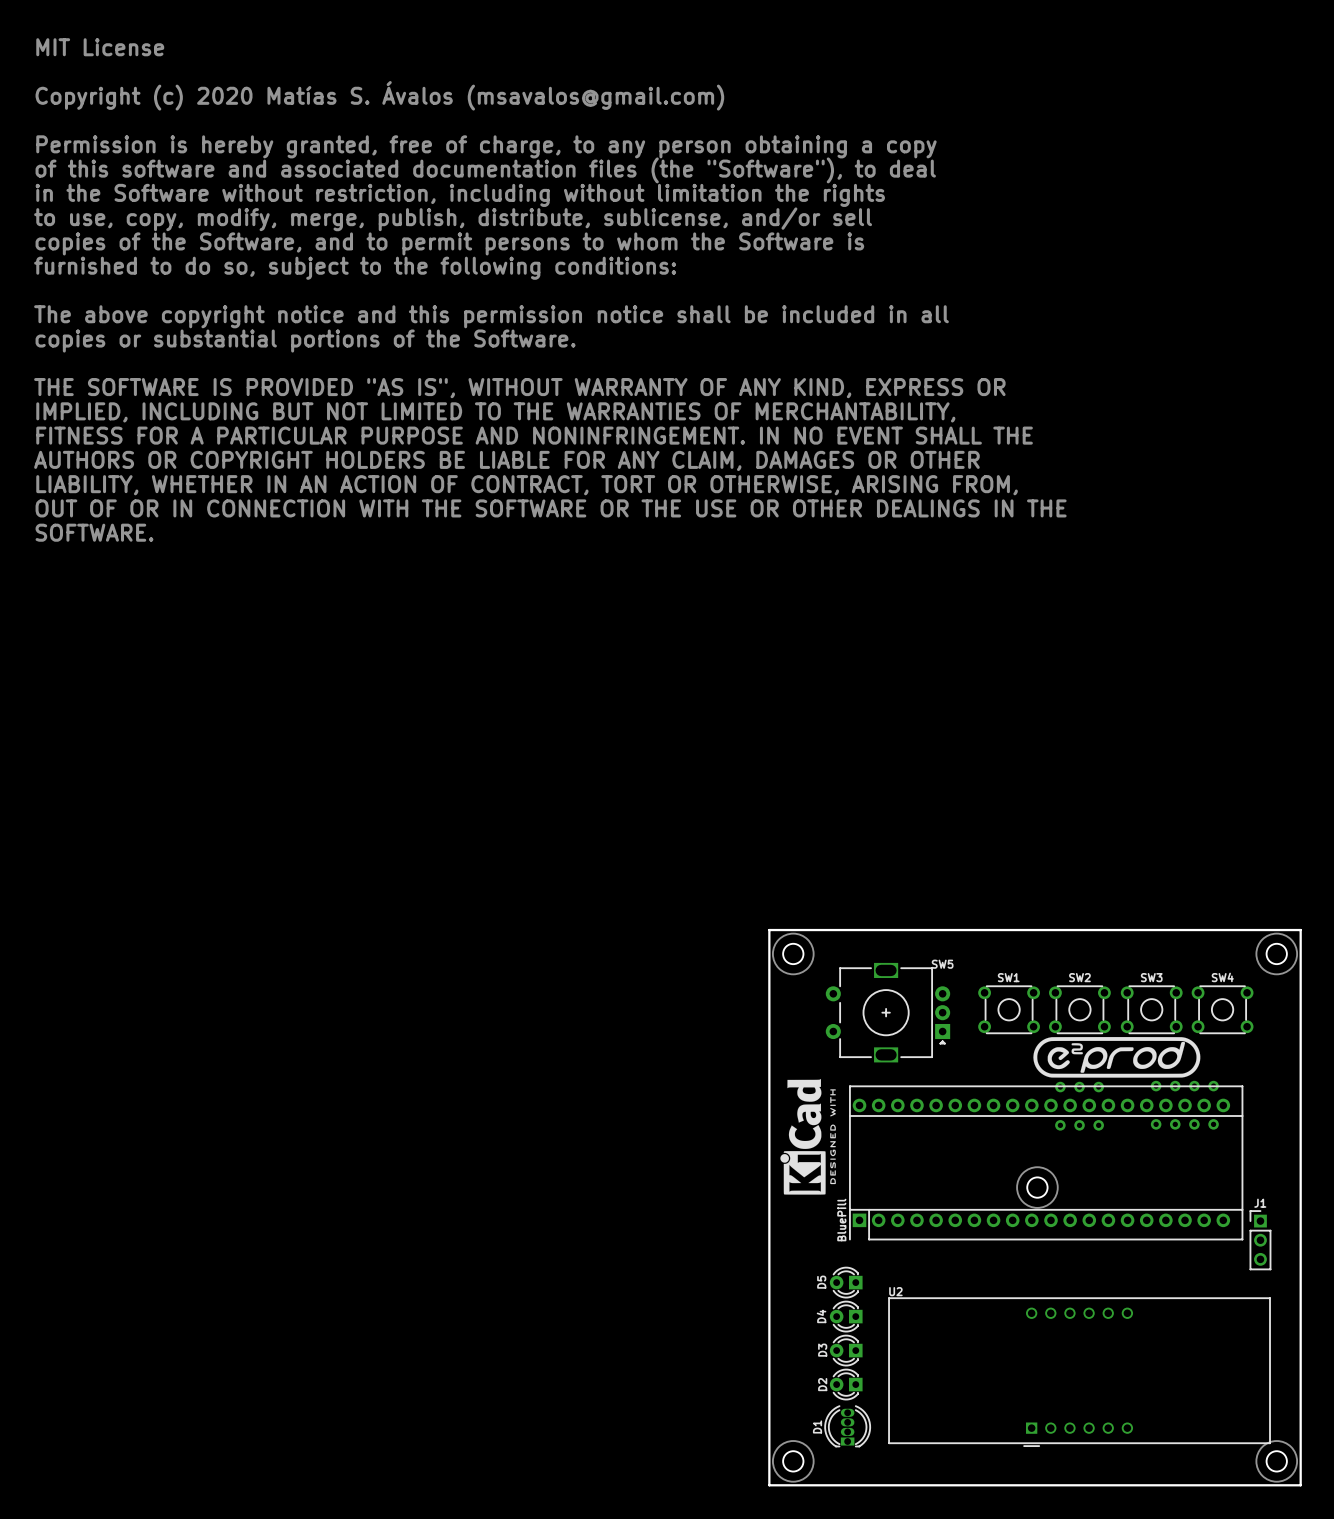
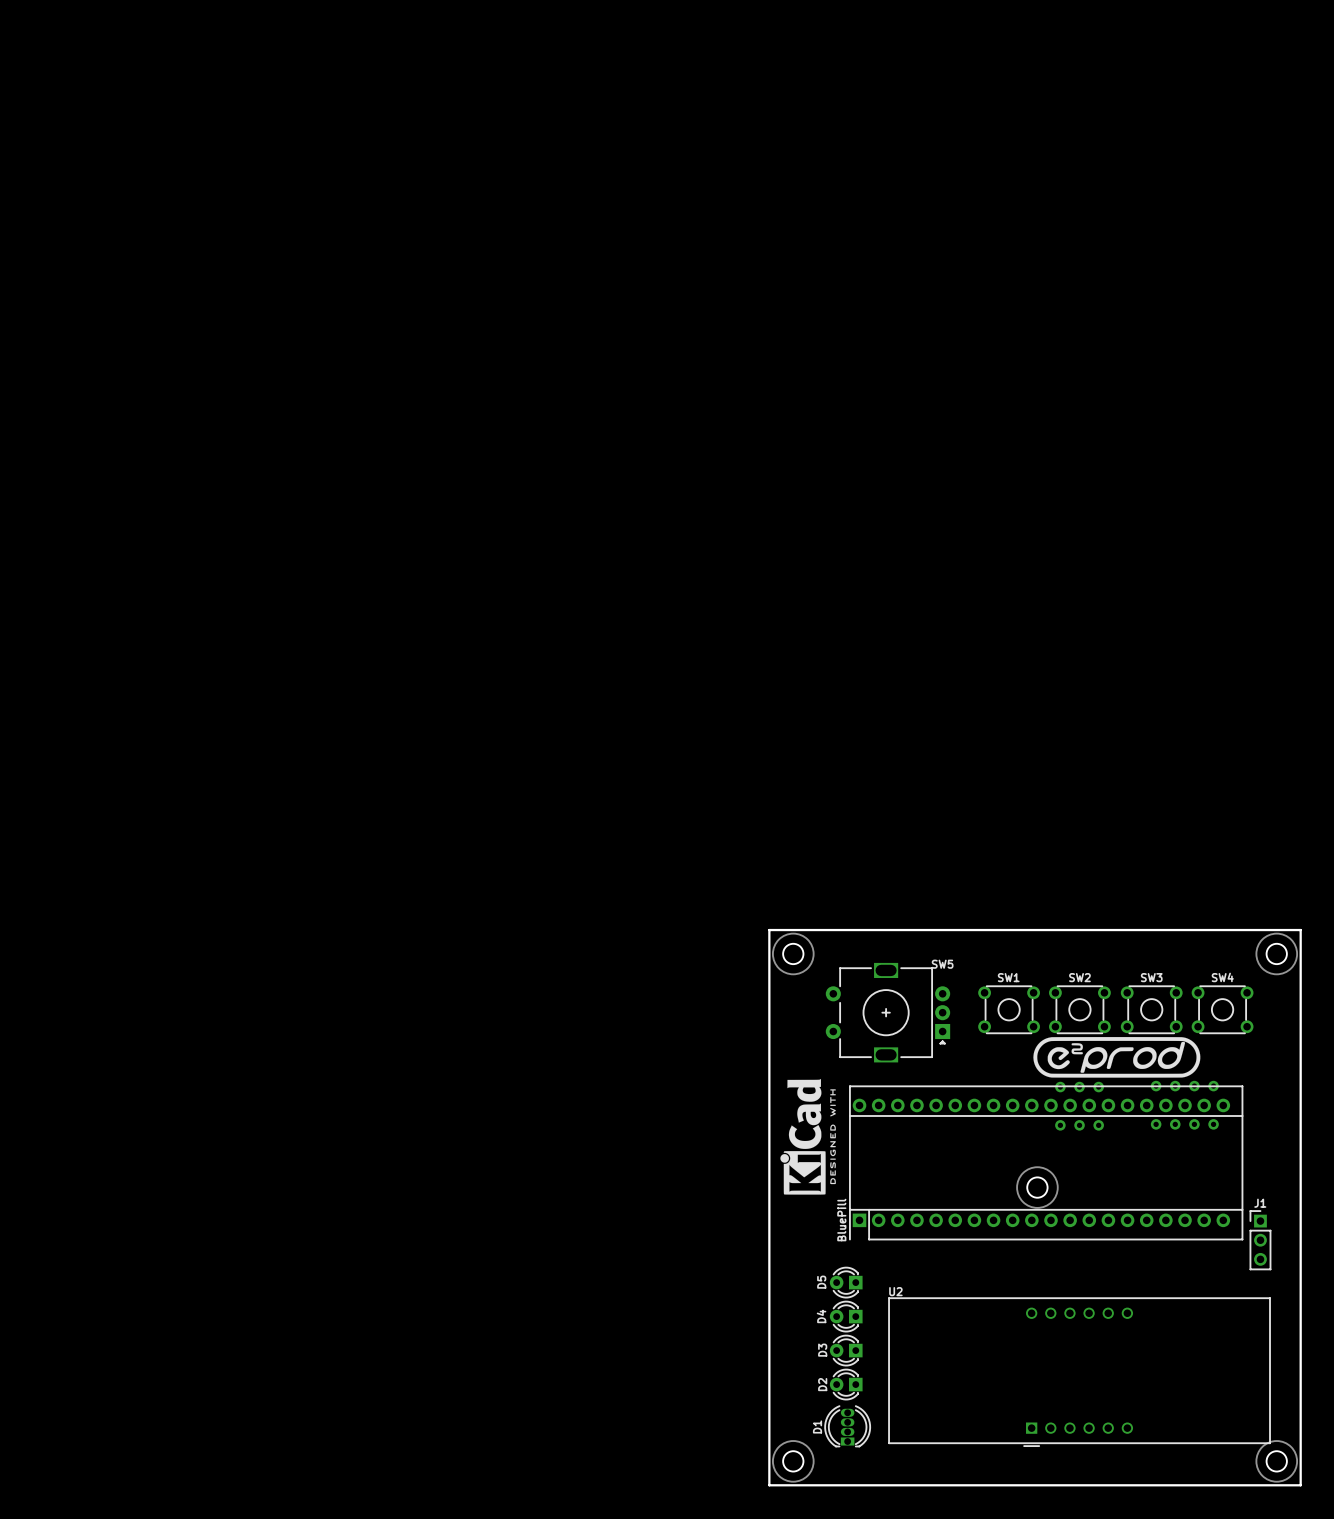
text: MIT License (100, 47) -> none
text: Copyright (c) 2020 Matías S. Ávalos (msavalos@gmail.com) (379, 95) -> none
text: Permission is hereby granted, free of charge, to any person obtaining a copy (486, 146) -> none
text: of this software and associated documentation files (the "Software"), to deal (485, 170) -> none
text: in the Software without restriction, including without limitation the rights (460, 195) -> none
text: to use, copy, modify, merge, publish, distribute, sublicense, and/or sell (453, 219) -> none
text: copies of the Software, and to permit persons to whom the Software is (449, 243) -> none
text: furnished to do so, subject to the following conditions: (355, 268) -> none
text: The above copyright notice and this permission notice shall be included in all (491, 316) -> none
text: copies or substantial portions of the Software. (305, 341) -> none
text: THE SOFTWARE IS PROVIDED "AS IS", WITHOUT WARRANTY OF ANY KIND, EXPRESS OR (519, 388) -> none
text: IMPLIED, INCLUDING BUT NOT LIMITED TO THE WARRANTIES OF MERCHANTABILITY, (495, 412) -> none
text: FITNESS FOR A PARTICULAR PURPOSE AND NONINFRINGEMENT. IN NO EVENT SHALL THE (534, 435) -> none
text: AUTHORS OR COPYRIGHT HOLDERS BE LIABLE FOR ANY CLAIM, DAMAGES OR OTHER (506, 460) -> none
text: LIABILITY, WHETHER IN AN ACTION OF CONTRACT, TORT OR OTHERWISE, ARISING FROM, (527, 485) -> none
text: OUT OF OR IN CONNECTION WITH THE SOFTWARE OR THE USE OR OTHER DEALINGS IN THE (551, 508) -> none
text: SOFTWARE. (94, 532) -> none

